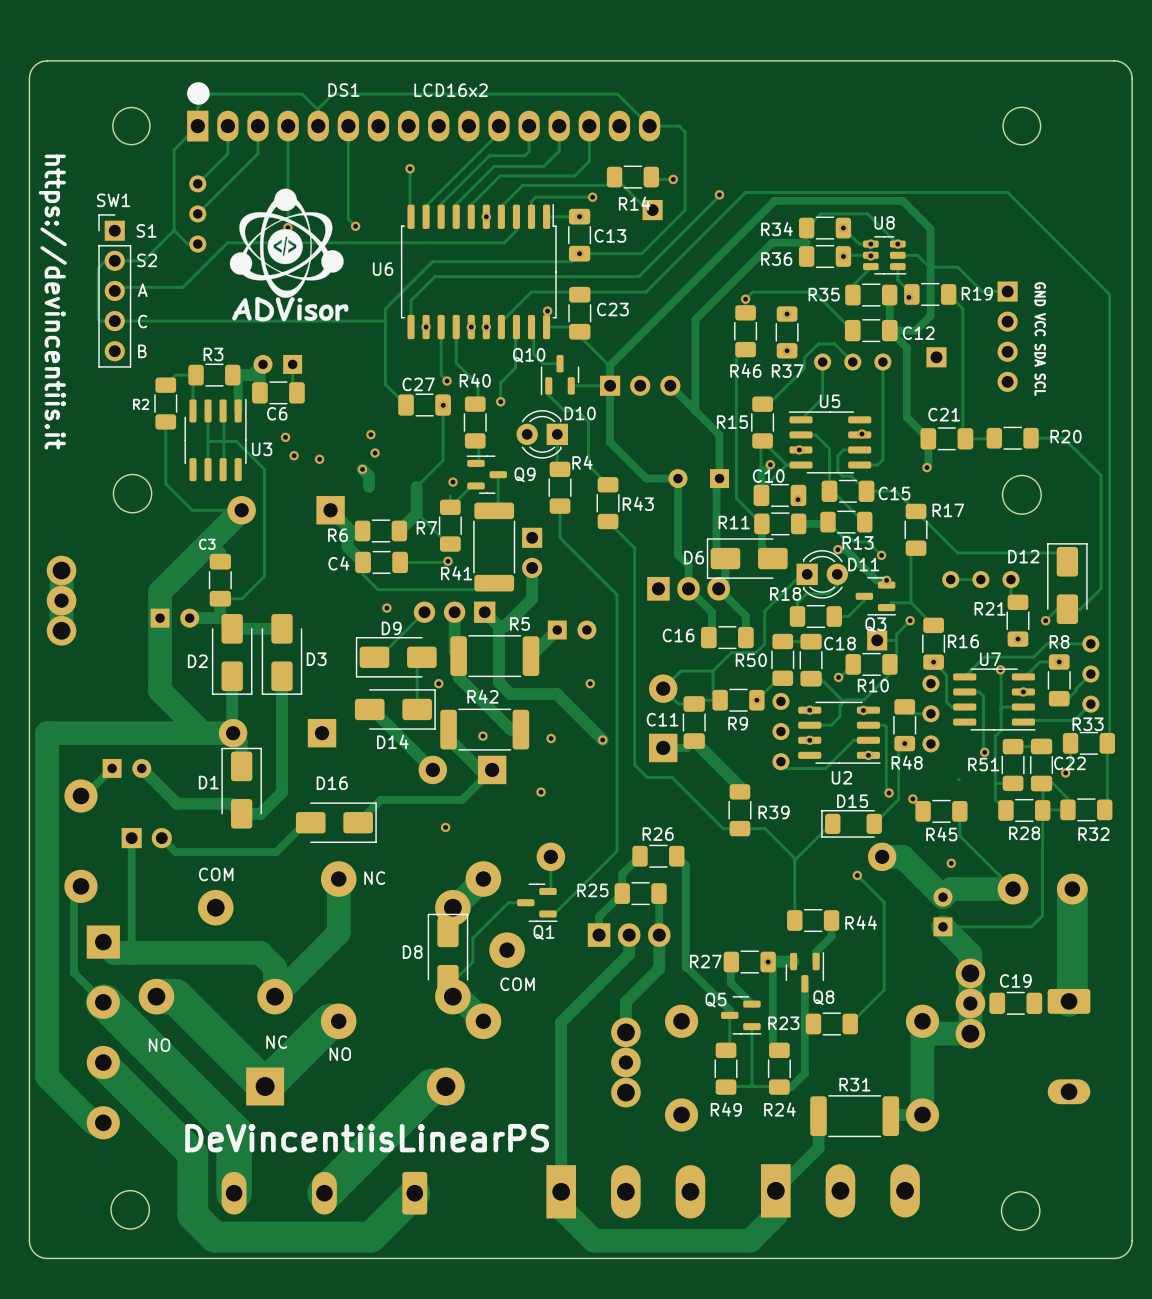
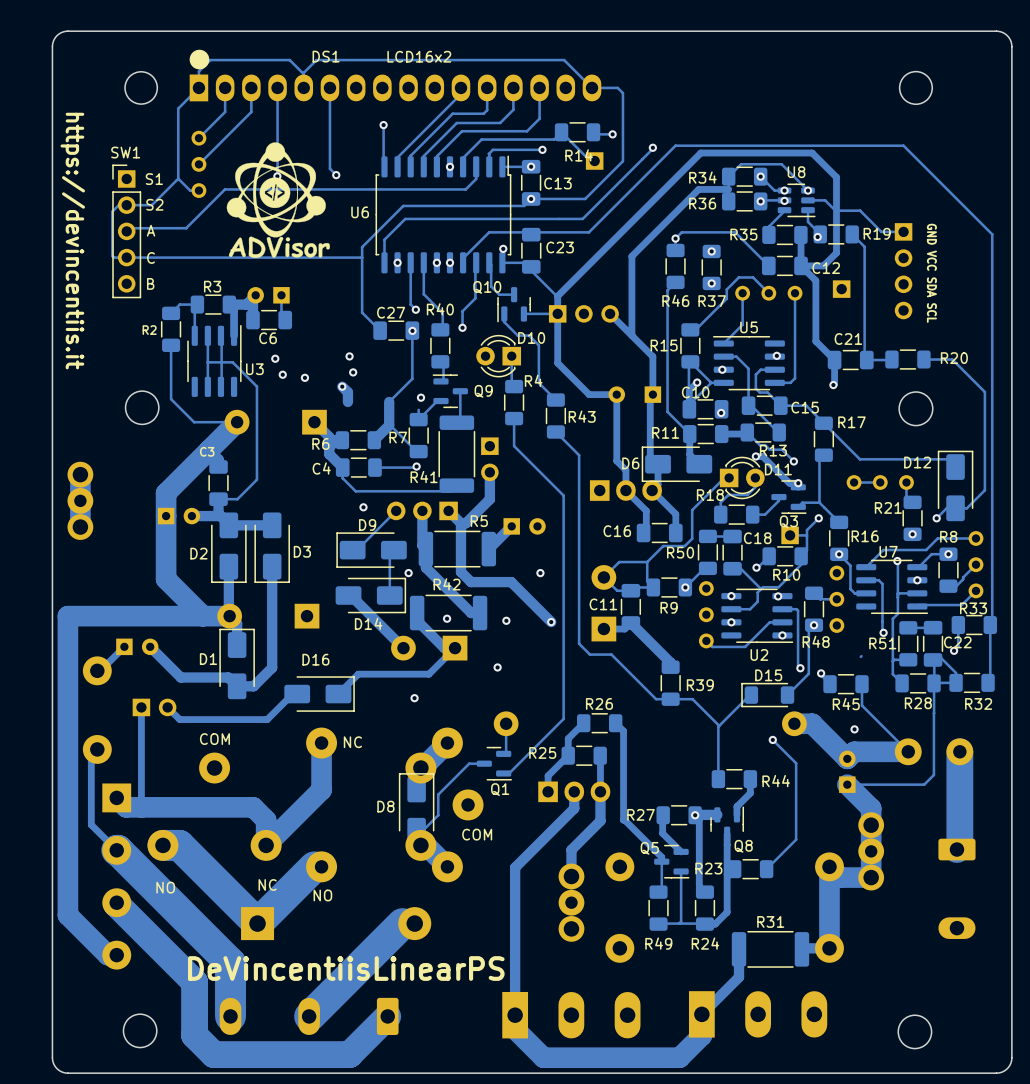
C19: (1015, 1003) -> none

